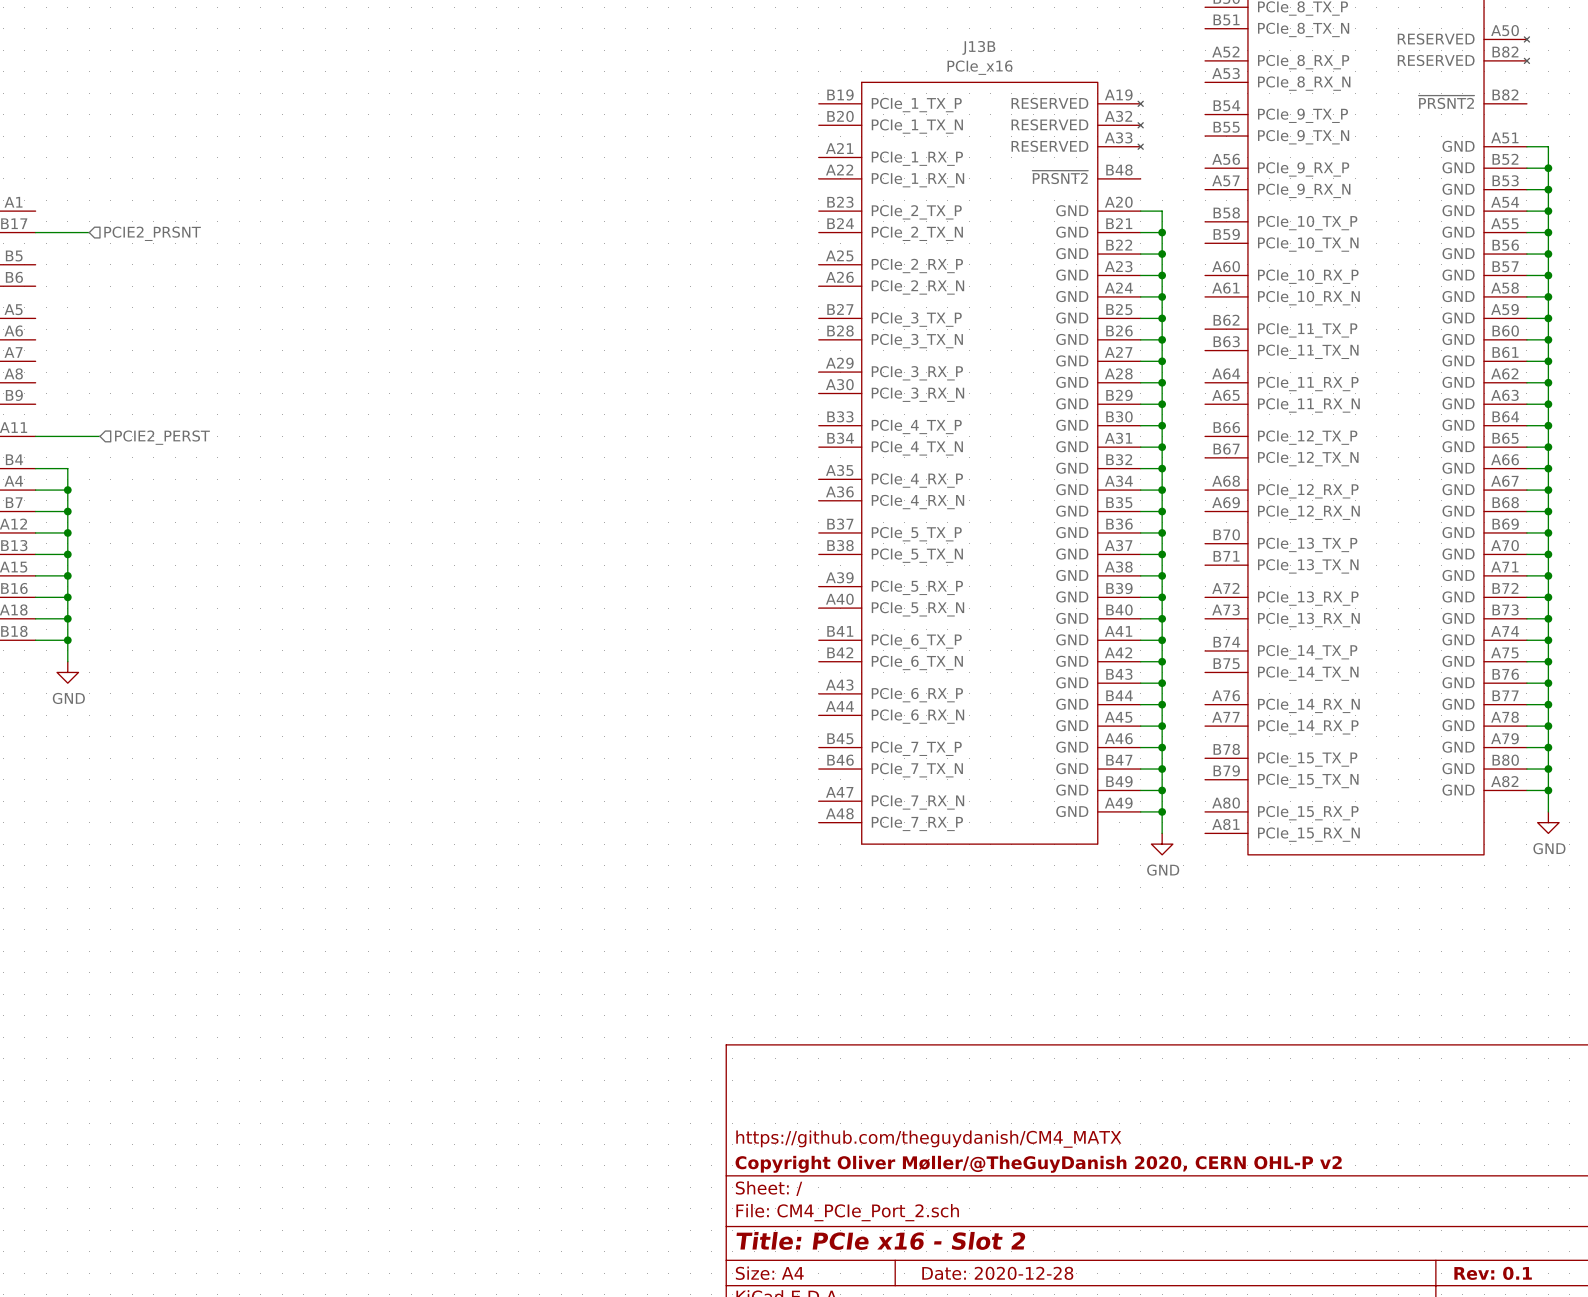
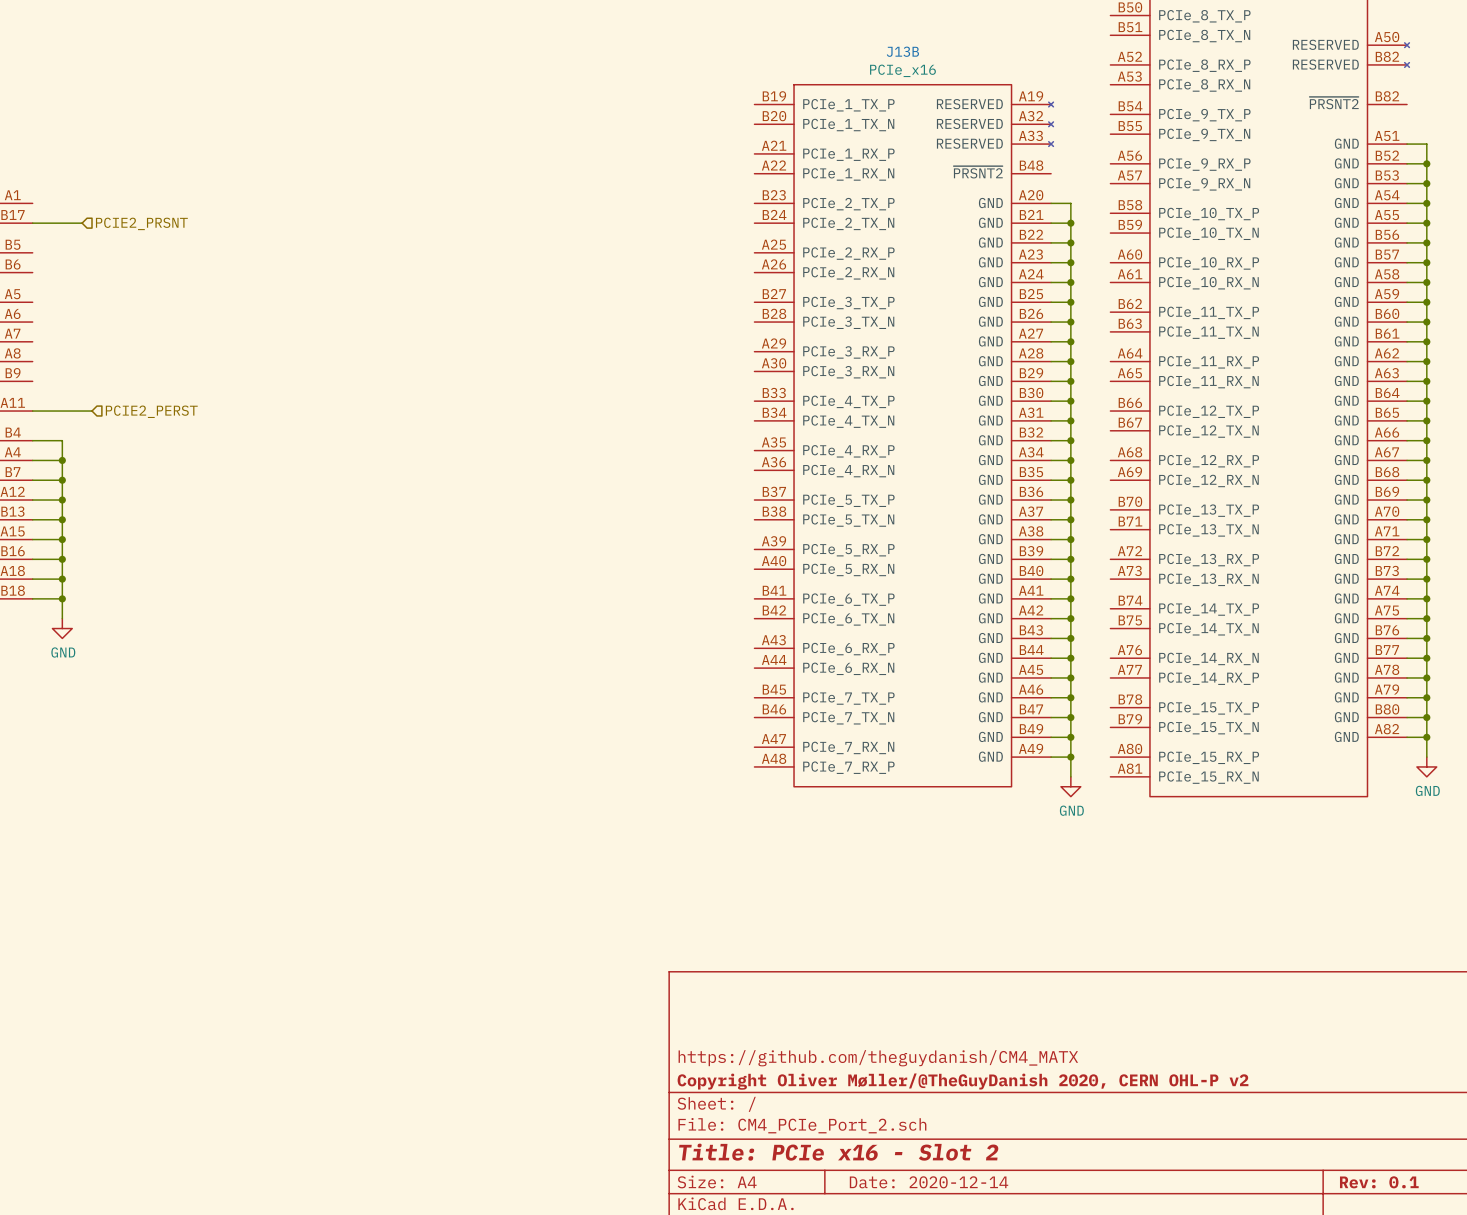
title block: Date: 2020-12-28 (997, 1273) -> Date: 2020-12-14 (929, 1182)

